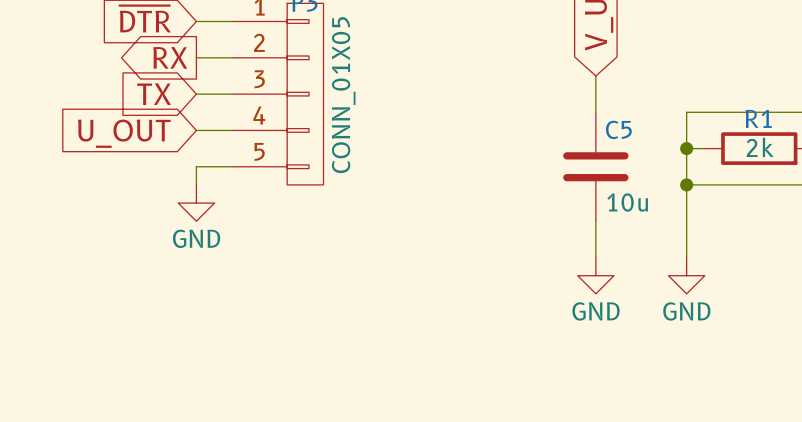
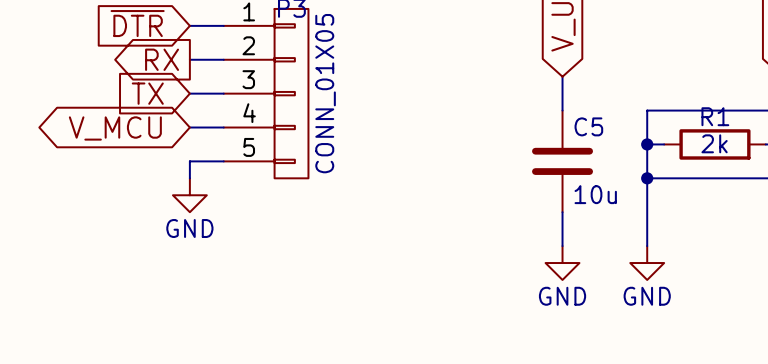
global label shape: input (124, 133) -> bidirectional (115, 128)
global label: U_OUT (124, 133) -> V_MCU (115, 128)

